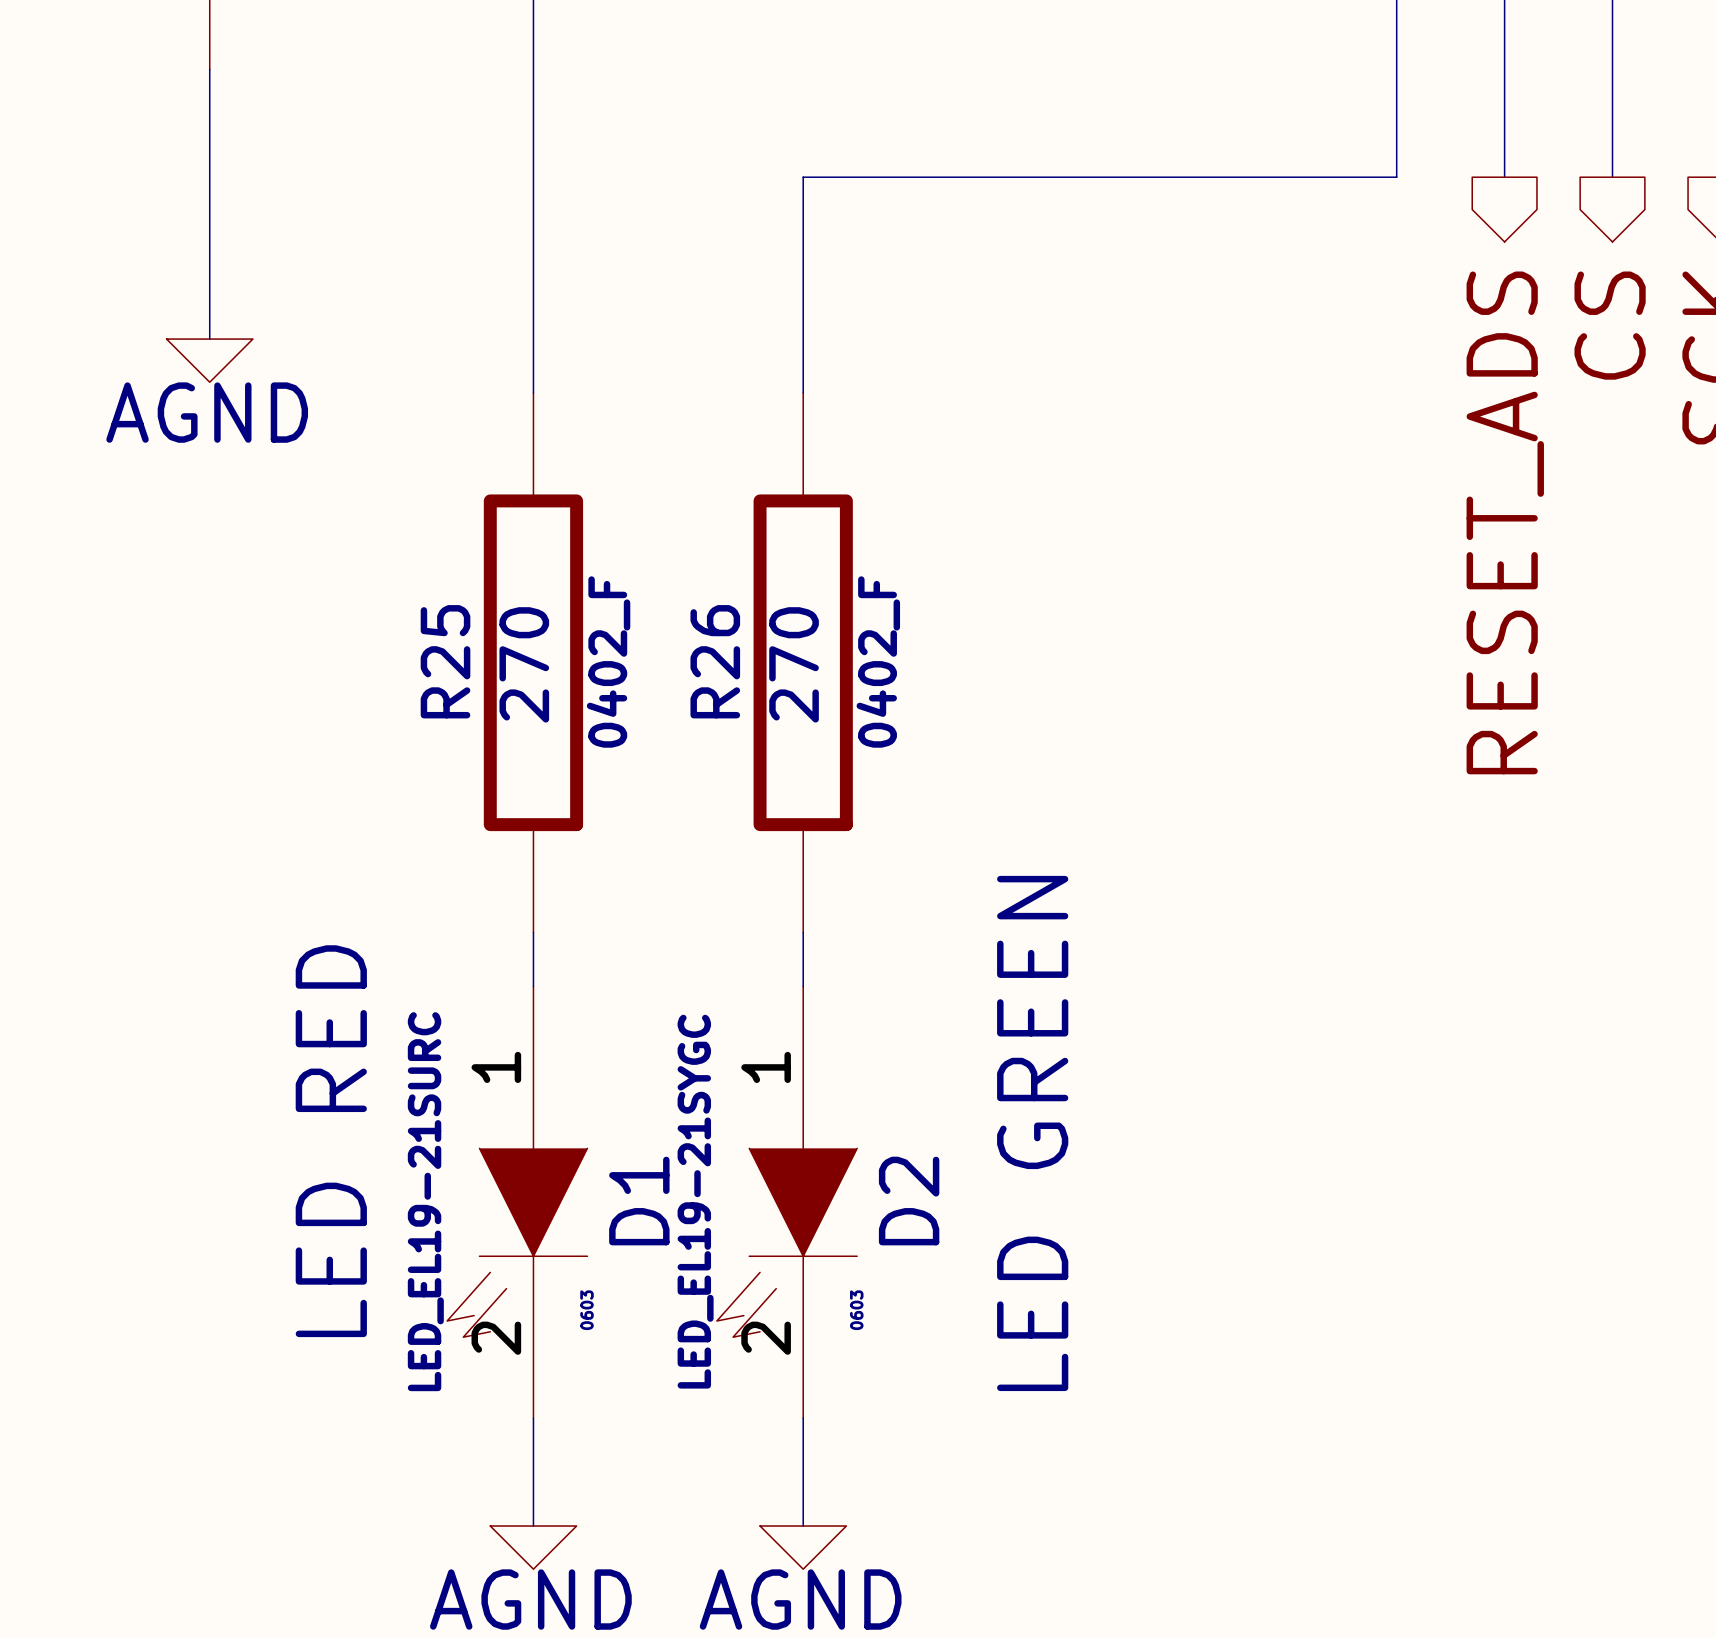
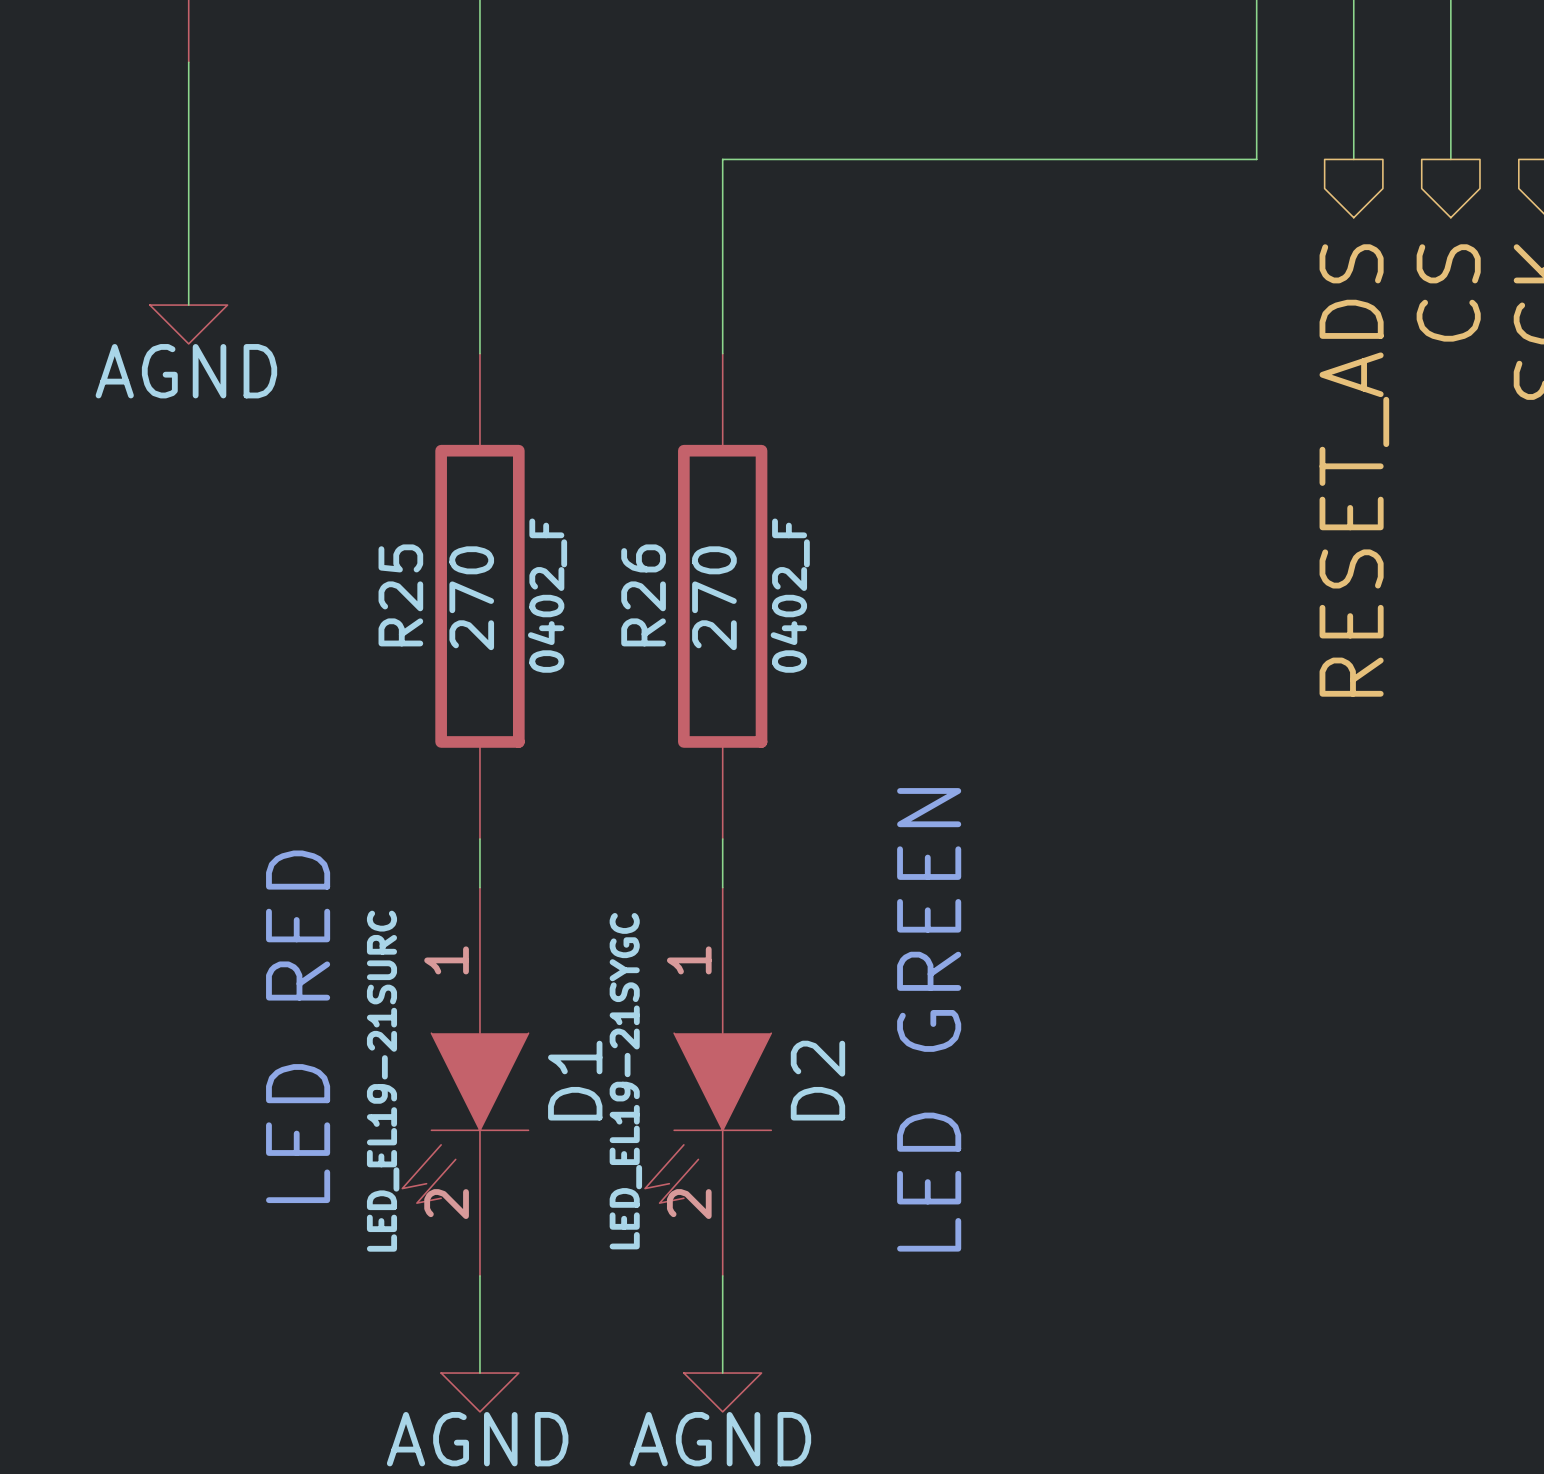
D1 text: 0603 (587, 1310) -> none
D2 text: 0603 (856, 1310) -> none

